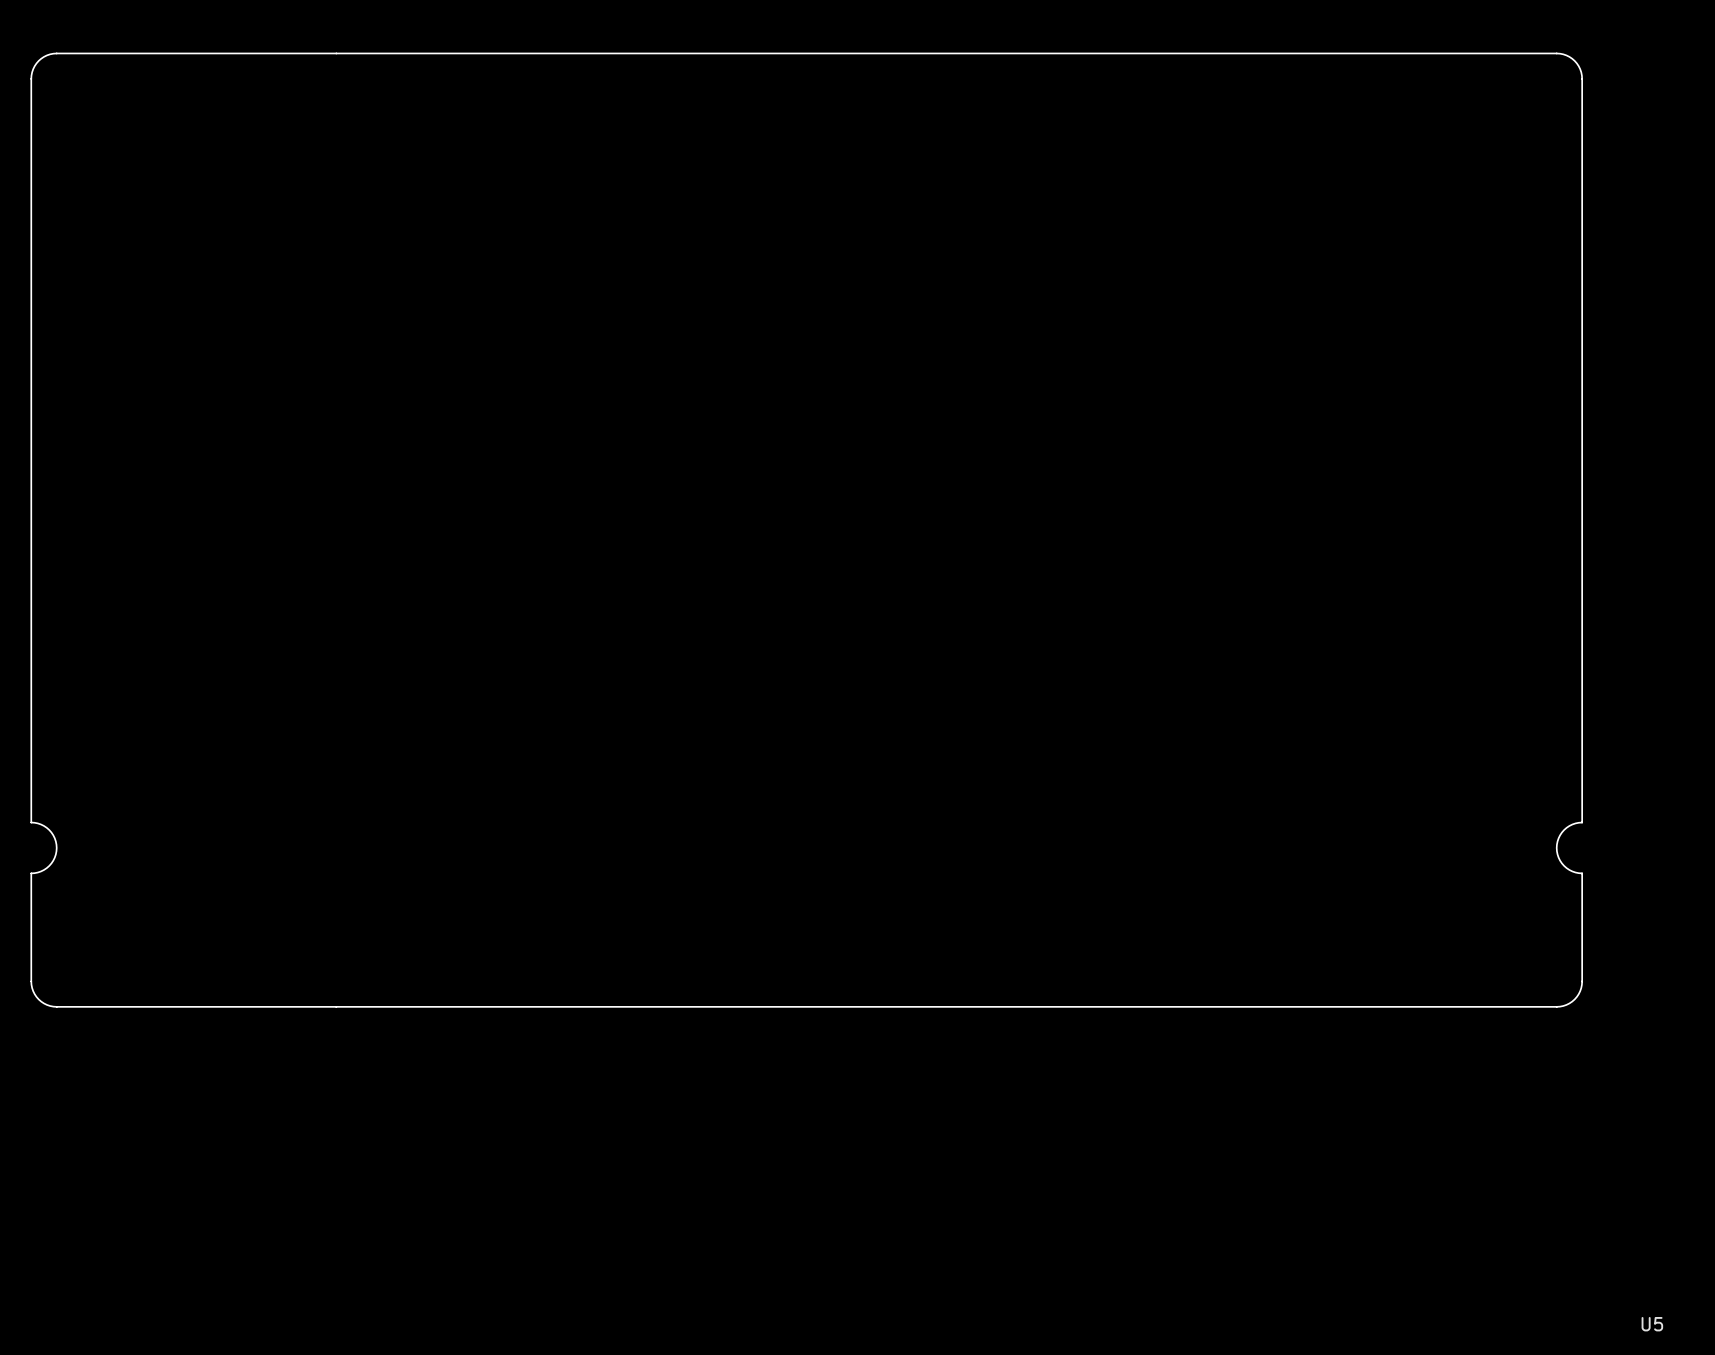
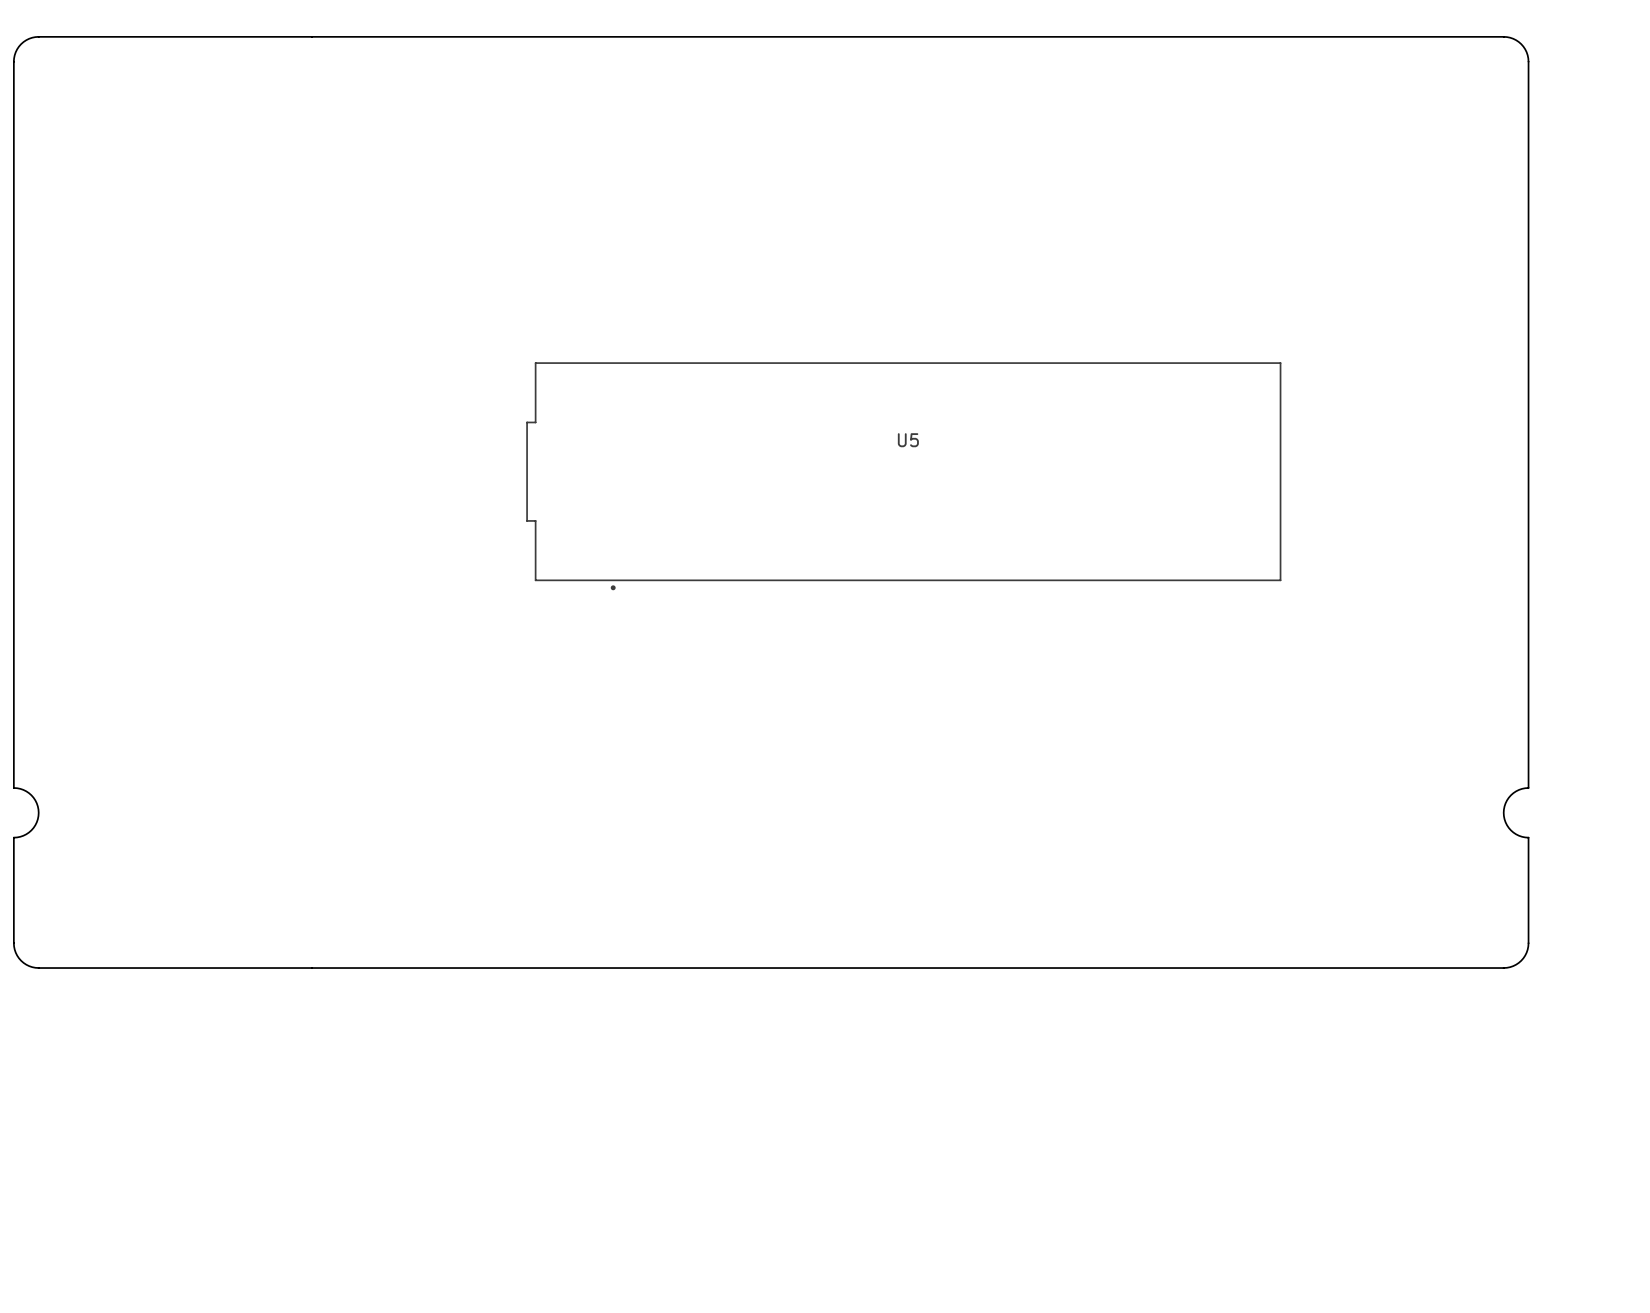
U5 footprint: [1641, 1317, 1664, 1332] -> [526, 362, 1282, 591]
U5 name position: U5 (1652, 1324) -> U5 (908, 440)

